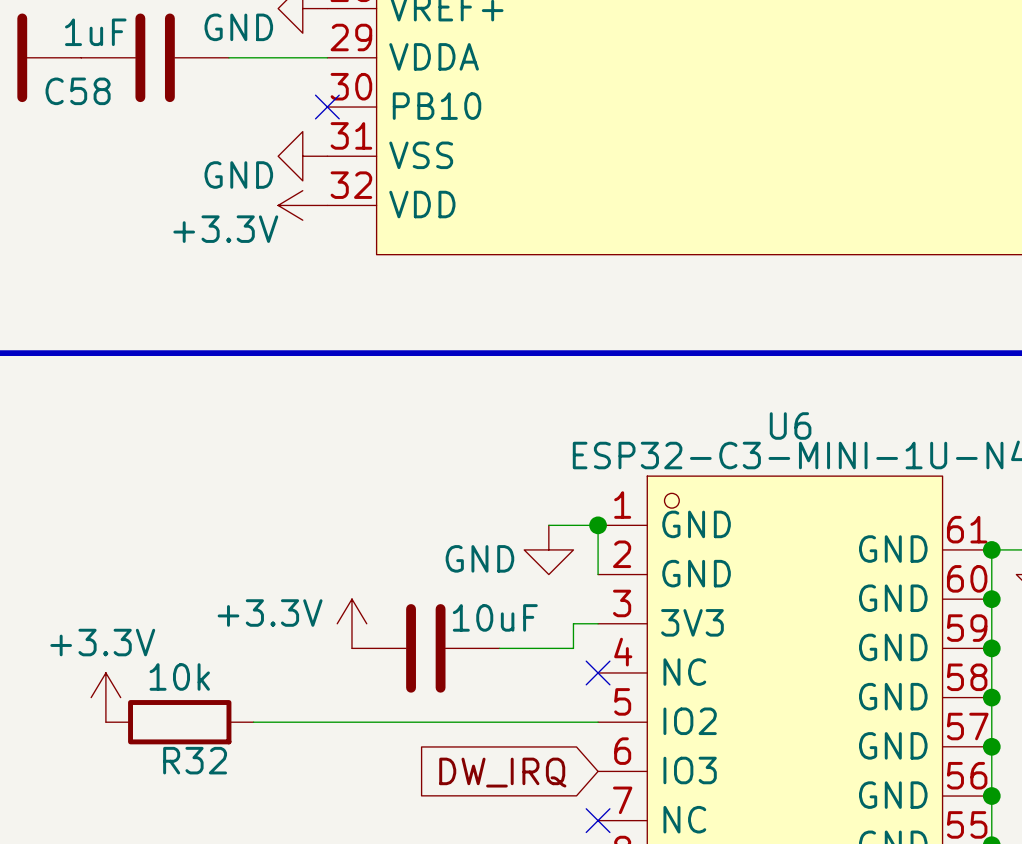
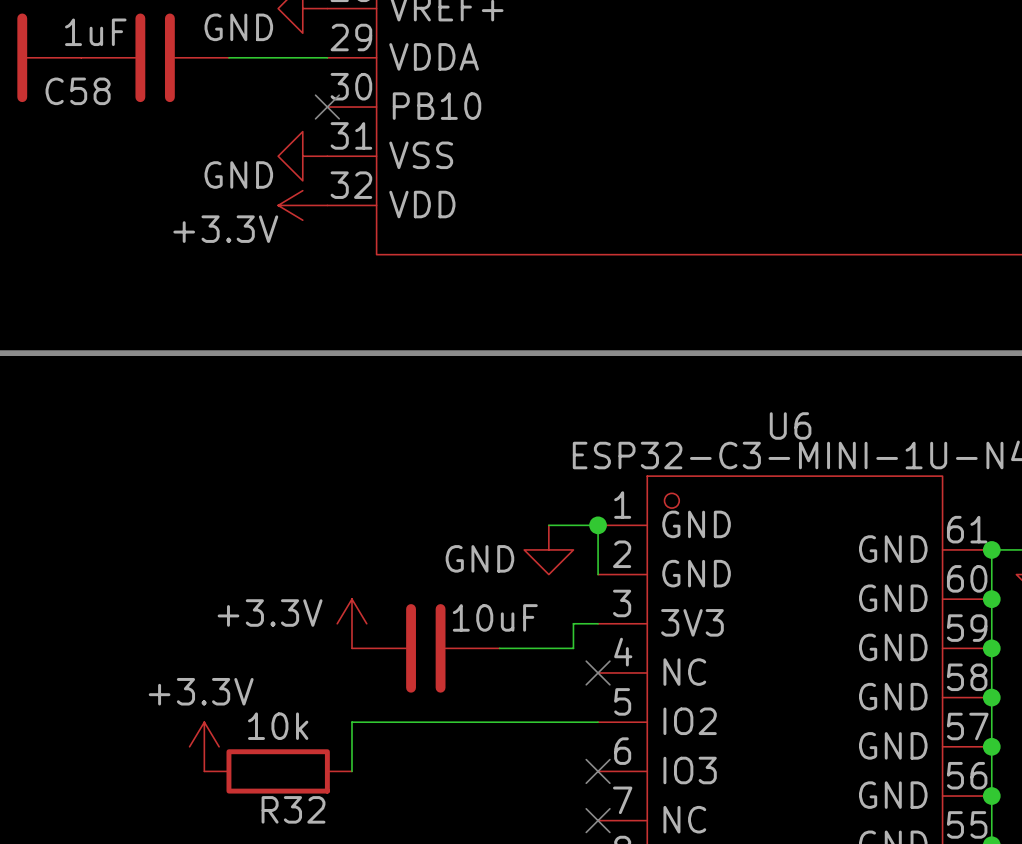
power symbol position: +3.3V (105, 697) -> +3.3V (204, 746)
R32 position: (179, 722) -> (278, 771)
wire: (253, 722) (351, 722) -> (351, 771) (351, 722)
no-connect mark: none -> (598, 771)
global label: DW_IRQ (502, 772) -> none

